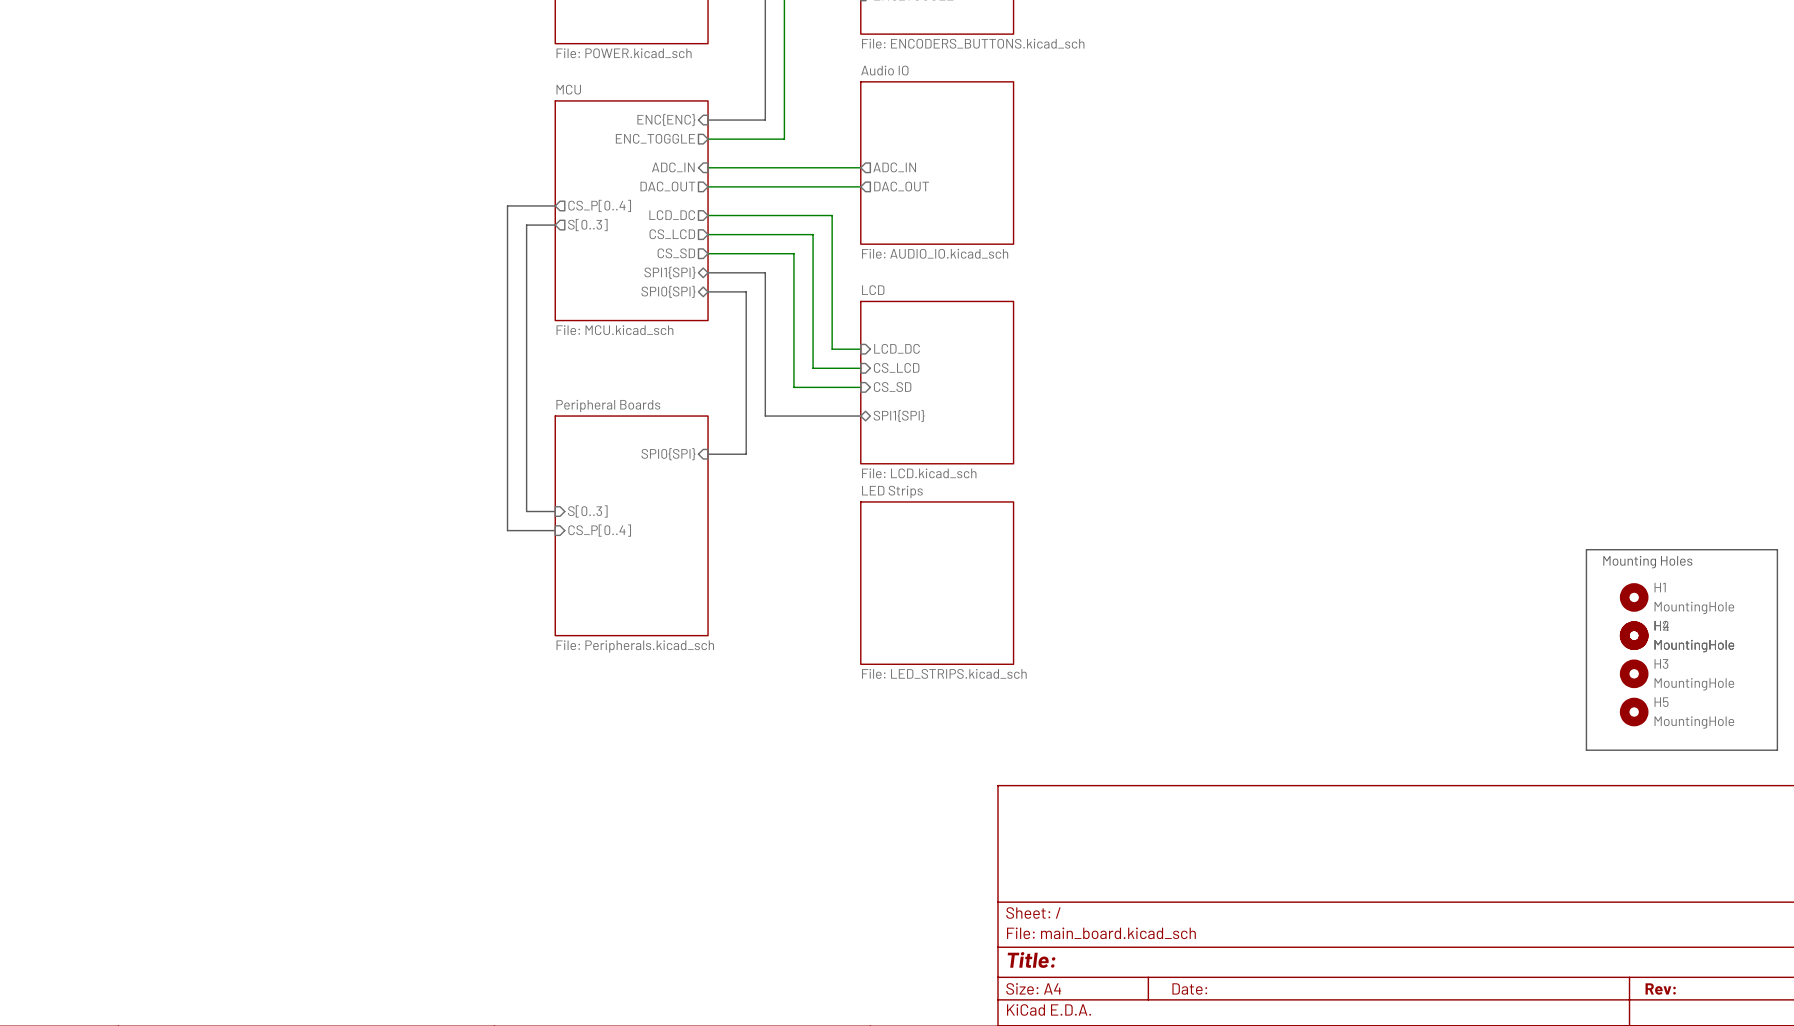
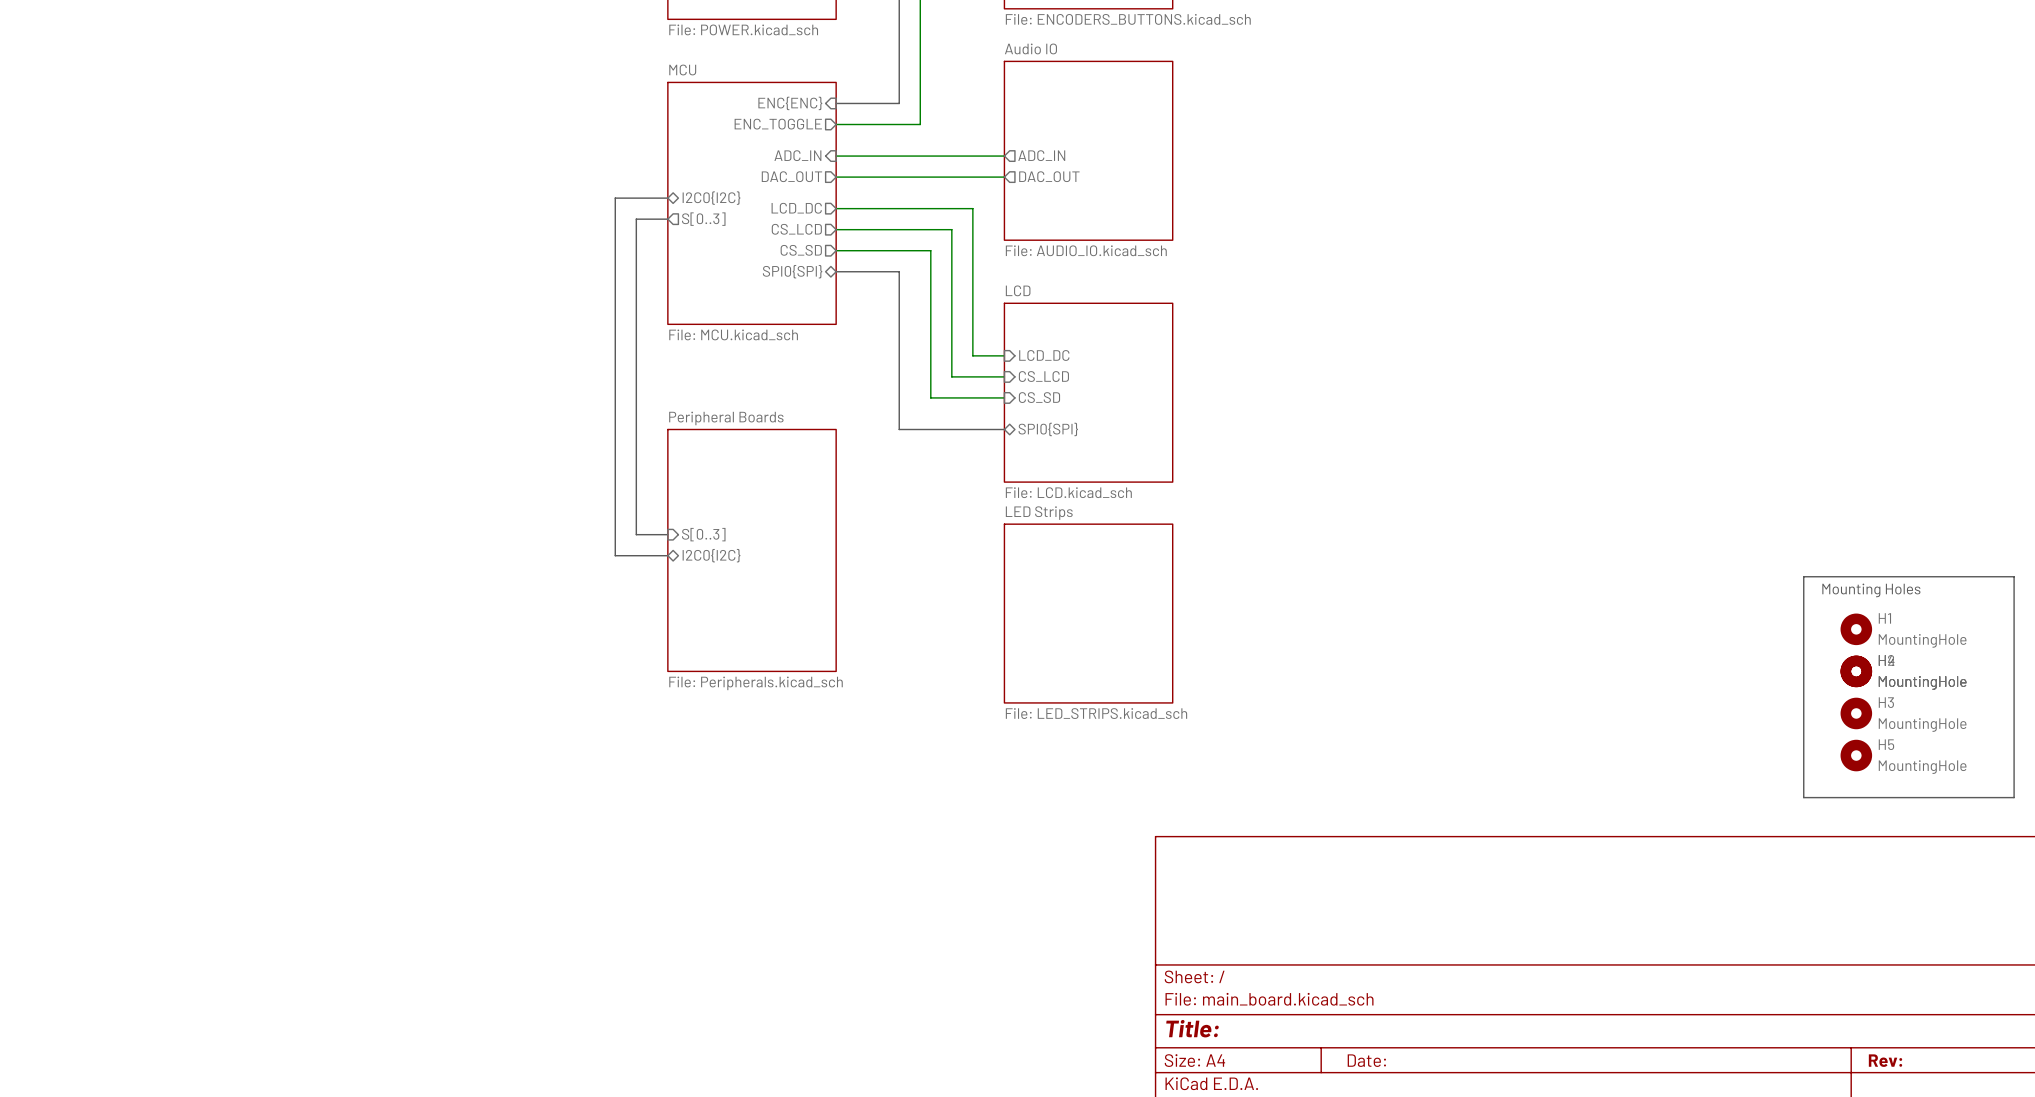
sheet pin shape: output (599, 205) -> bidirectional (711, 198)
sheet pin: CS_P[0..4] (599, 205) -> I2C0{I2C} (711, 198)
sheet pin: SPI1{SPI} (669, 272) -> SPI0{SPI} (792, 271)
sheet pin: SPI0{SPI} (668, 291) -> none
bus: (708, 291) (746, 291) (746, 454) (708, 454) -> none
sheet pin: SPI1{SPI} (899, 415) -> SPI0{SPI} (1048, 429)
sheet pin: SPI0{SPI} (668, 454) -> none
sheet pin shape: input (599, 530) -> bidirectional (711, 555)
sheet pin: CS_P[0..4] (599, 530) -> I2C0{I2C} (711, 555)

